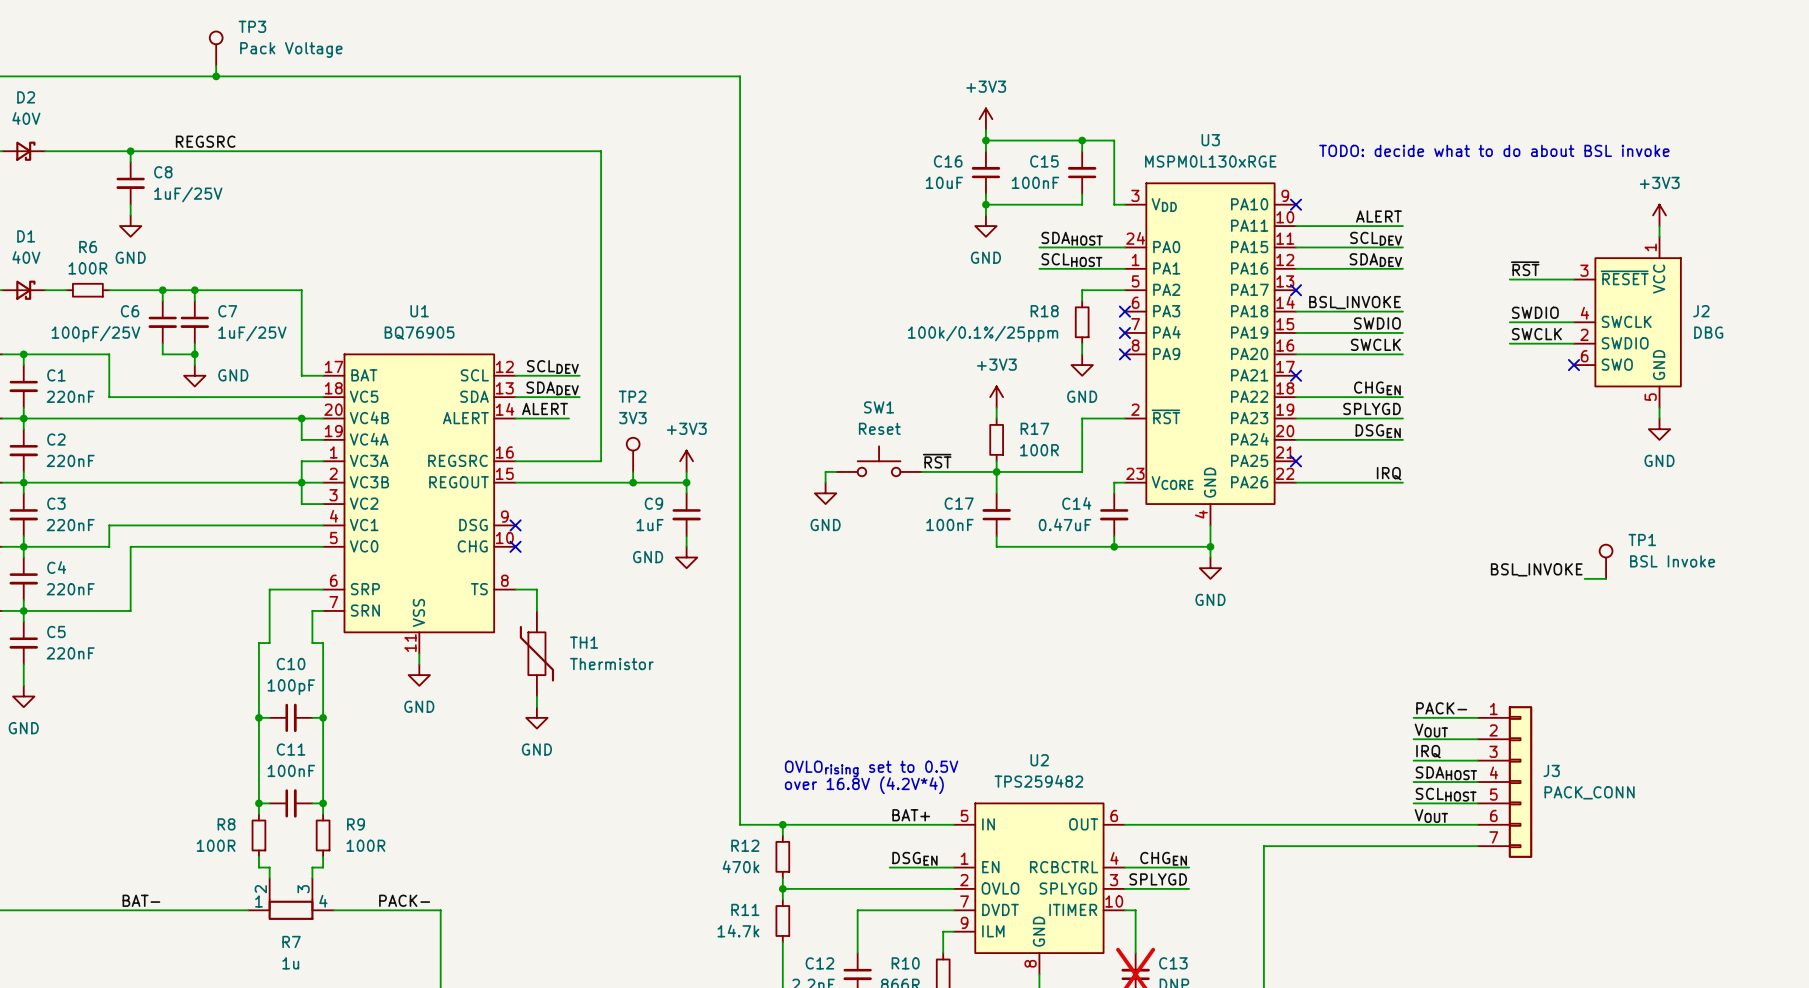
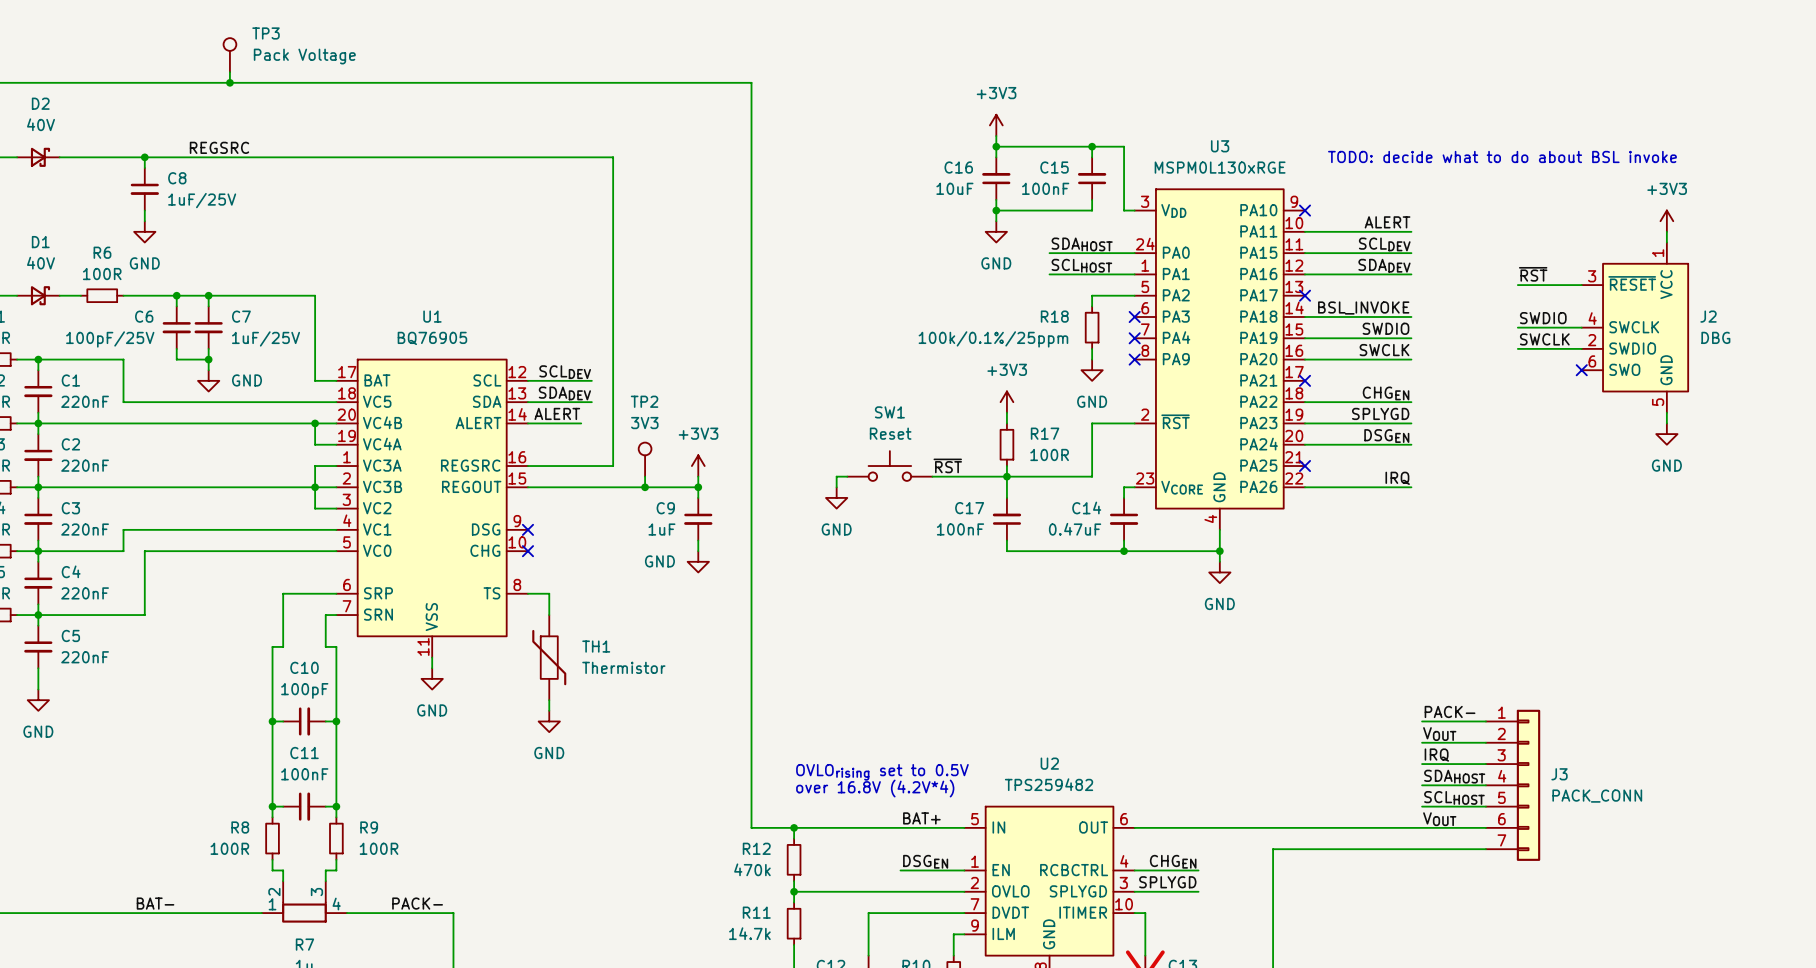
TP1: BSL Invoke (1606, 561) -> none
label: BSL_INVOKE (1536, 569) -> none
wire: (1584, 578) (1606, 578) -> none

